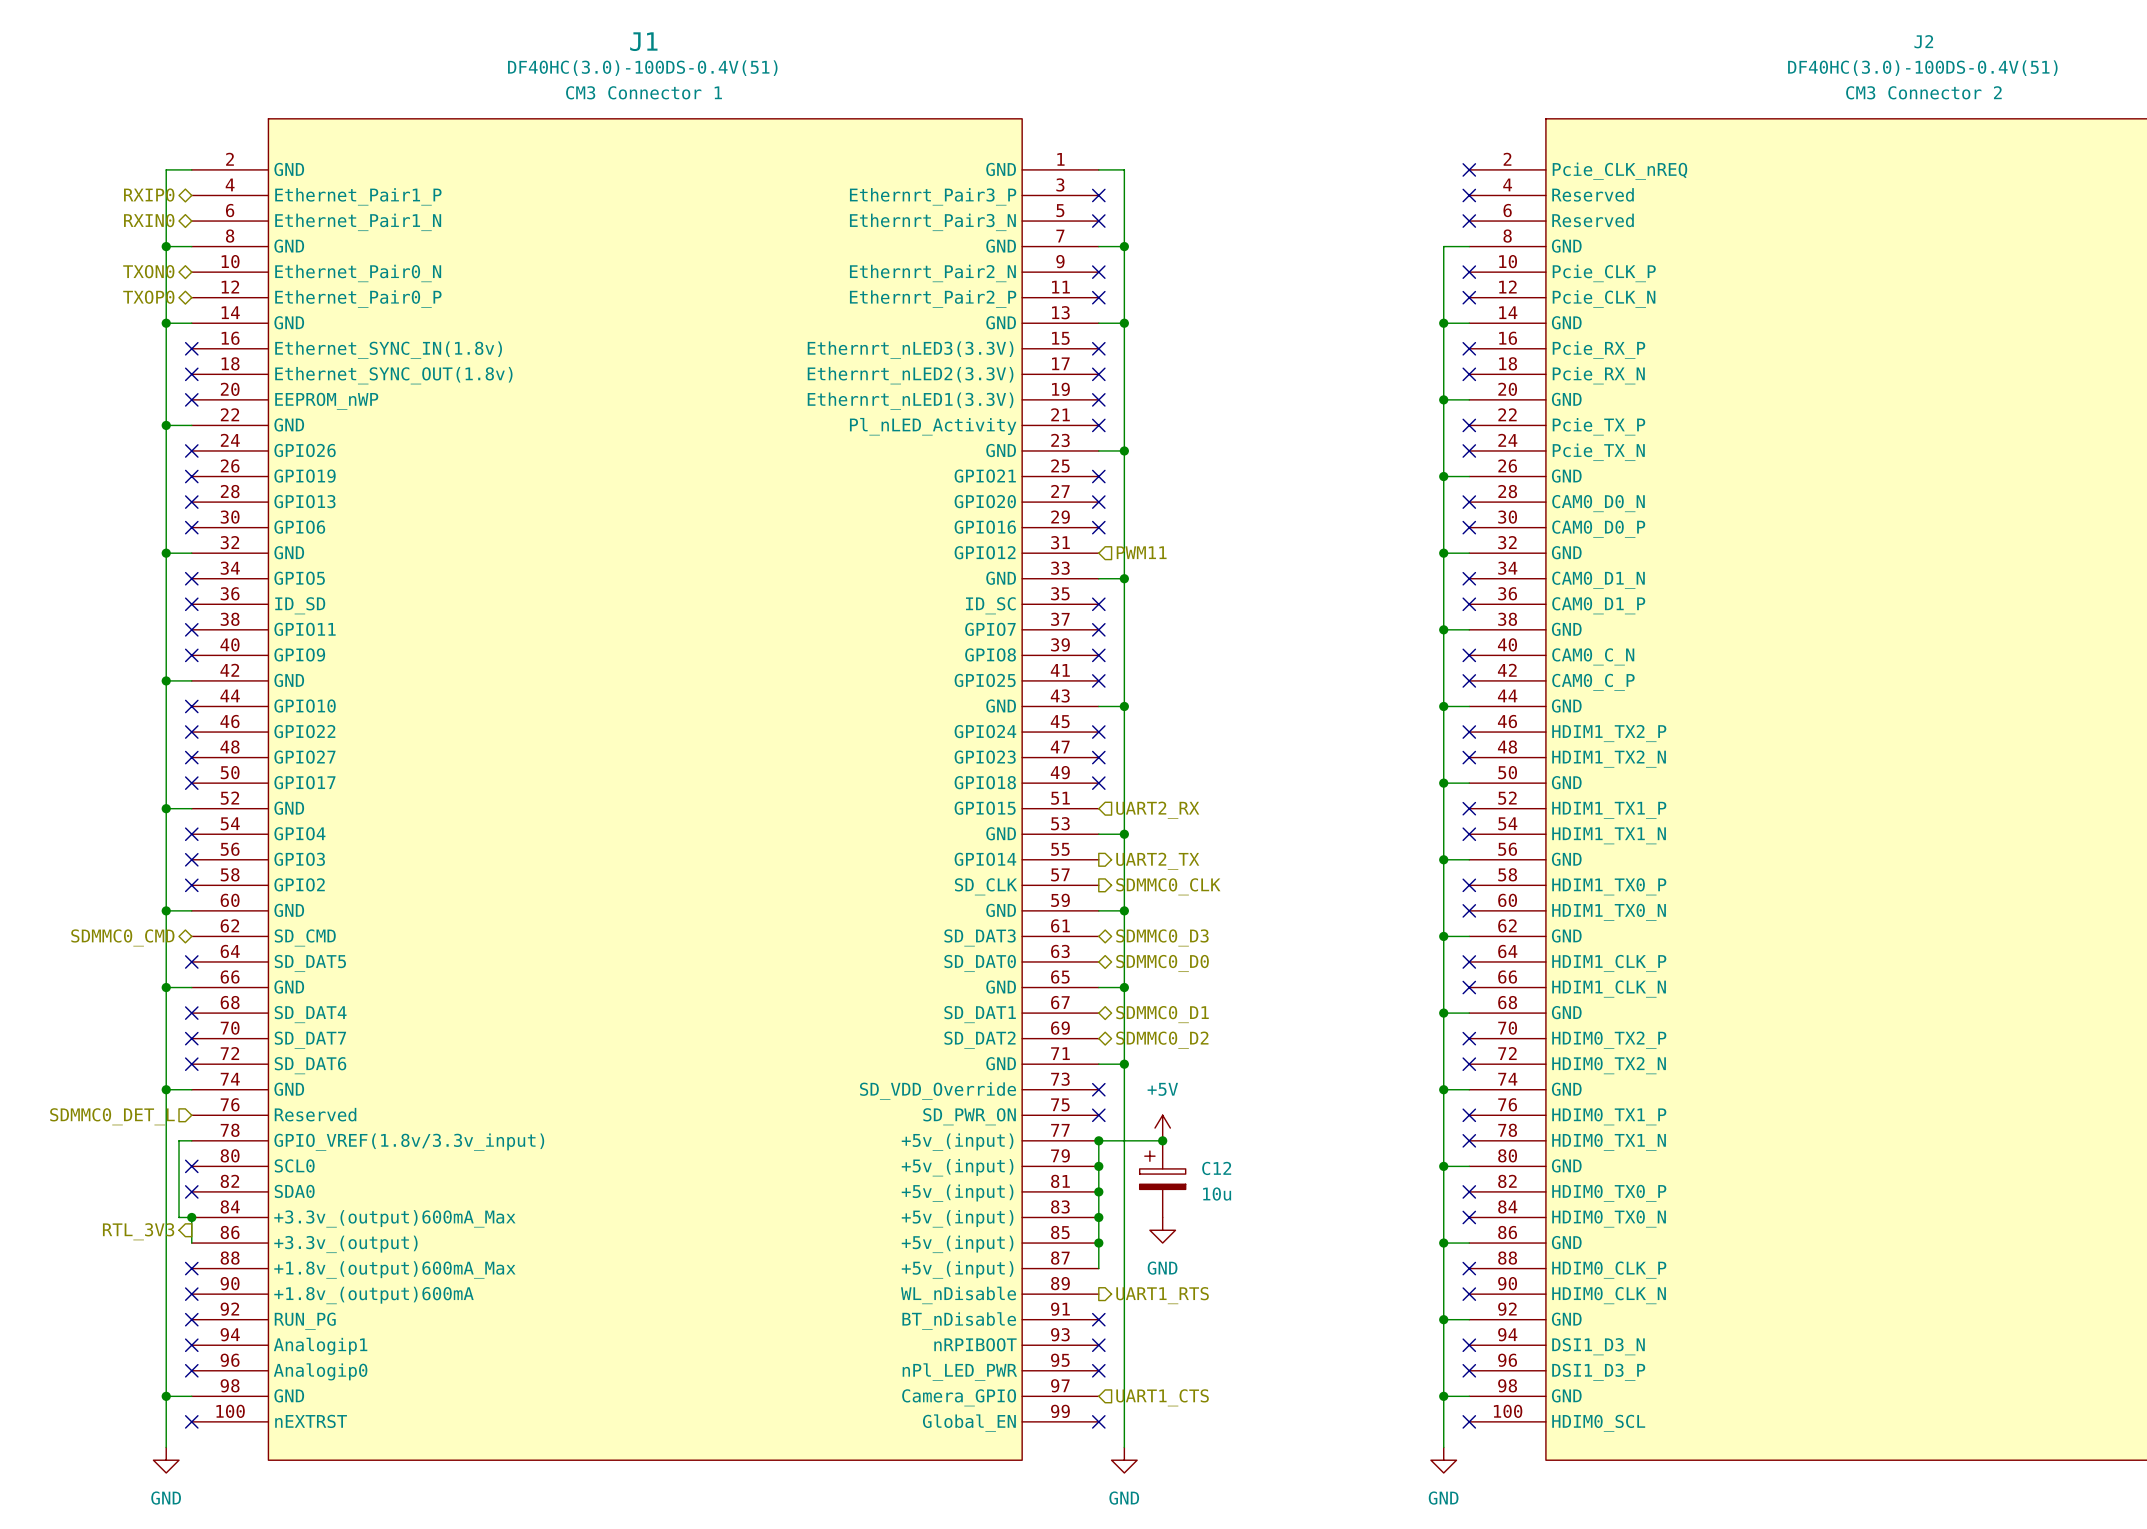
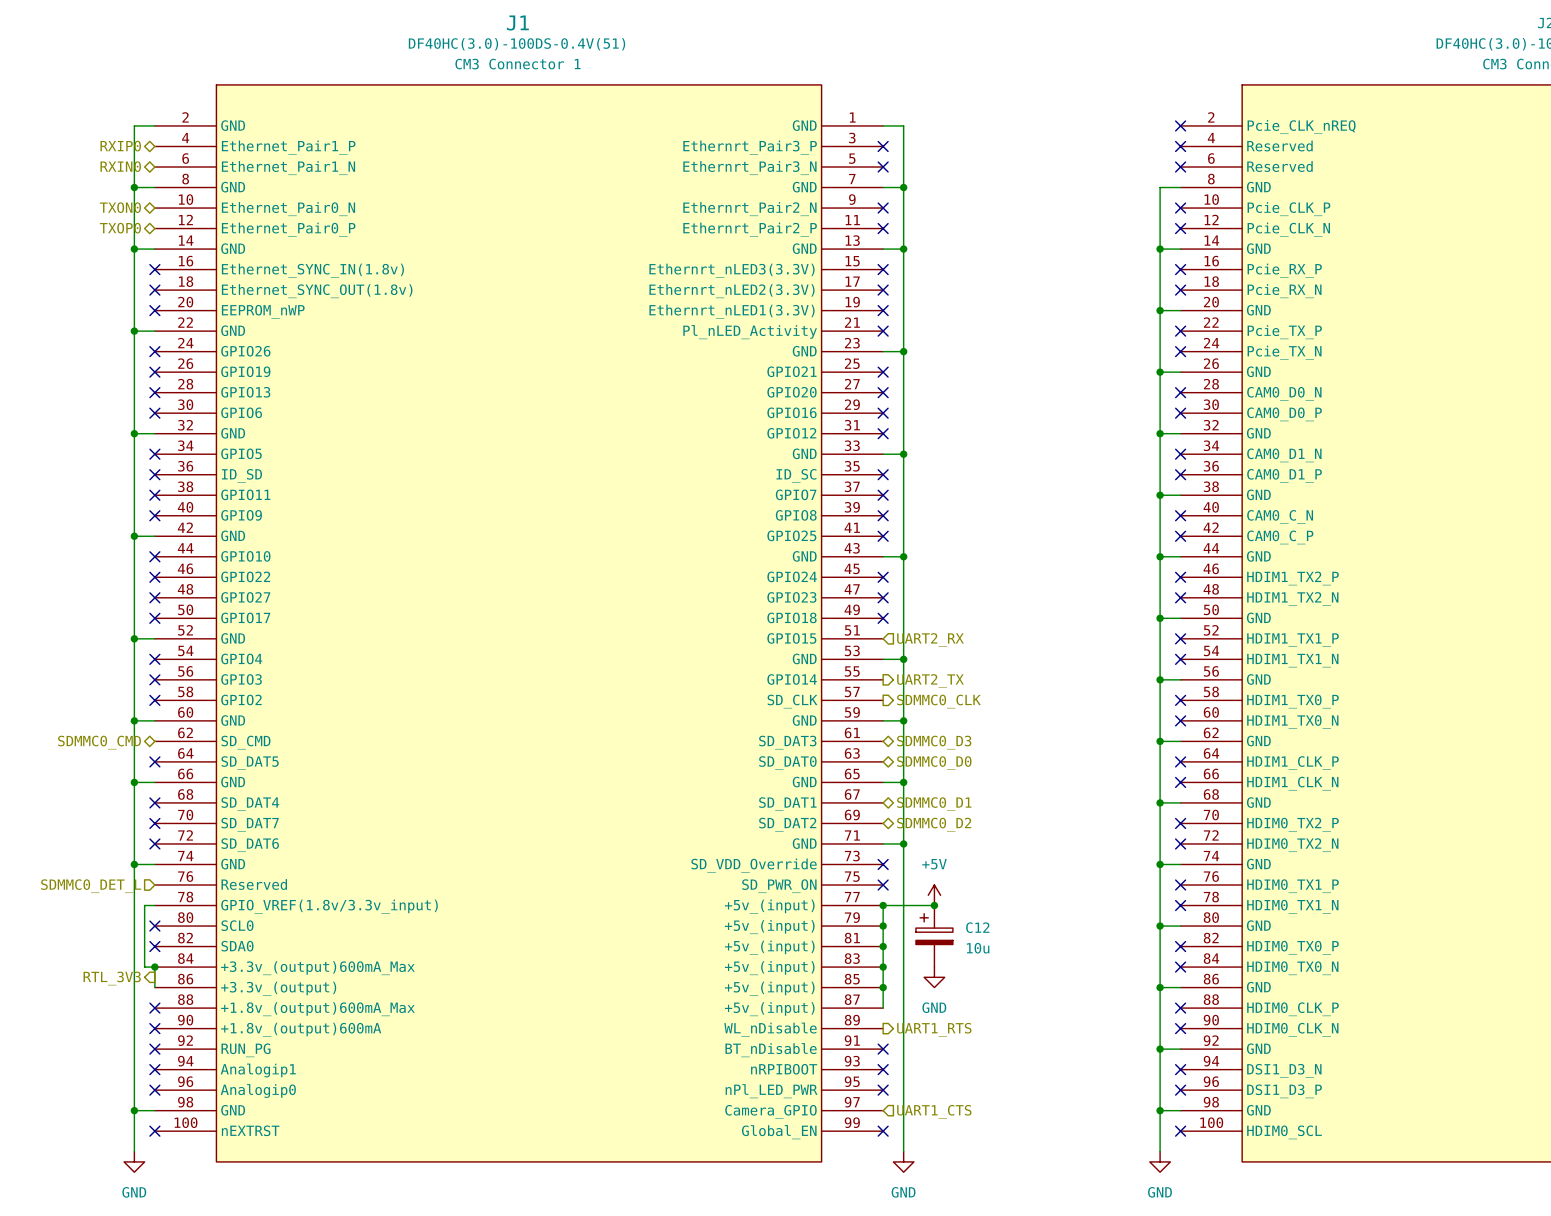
hierarchical label: PWM11 (1141, 552) -> none
no-connect mark: none -> (883, 433)

